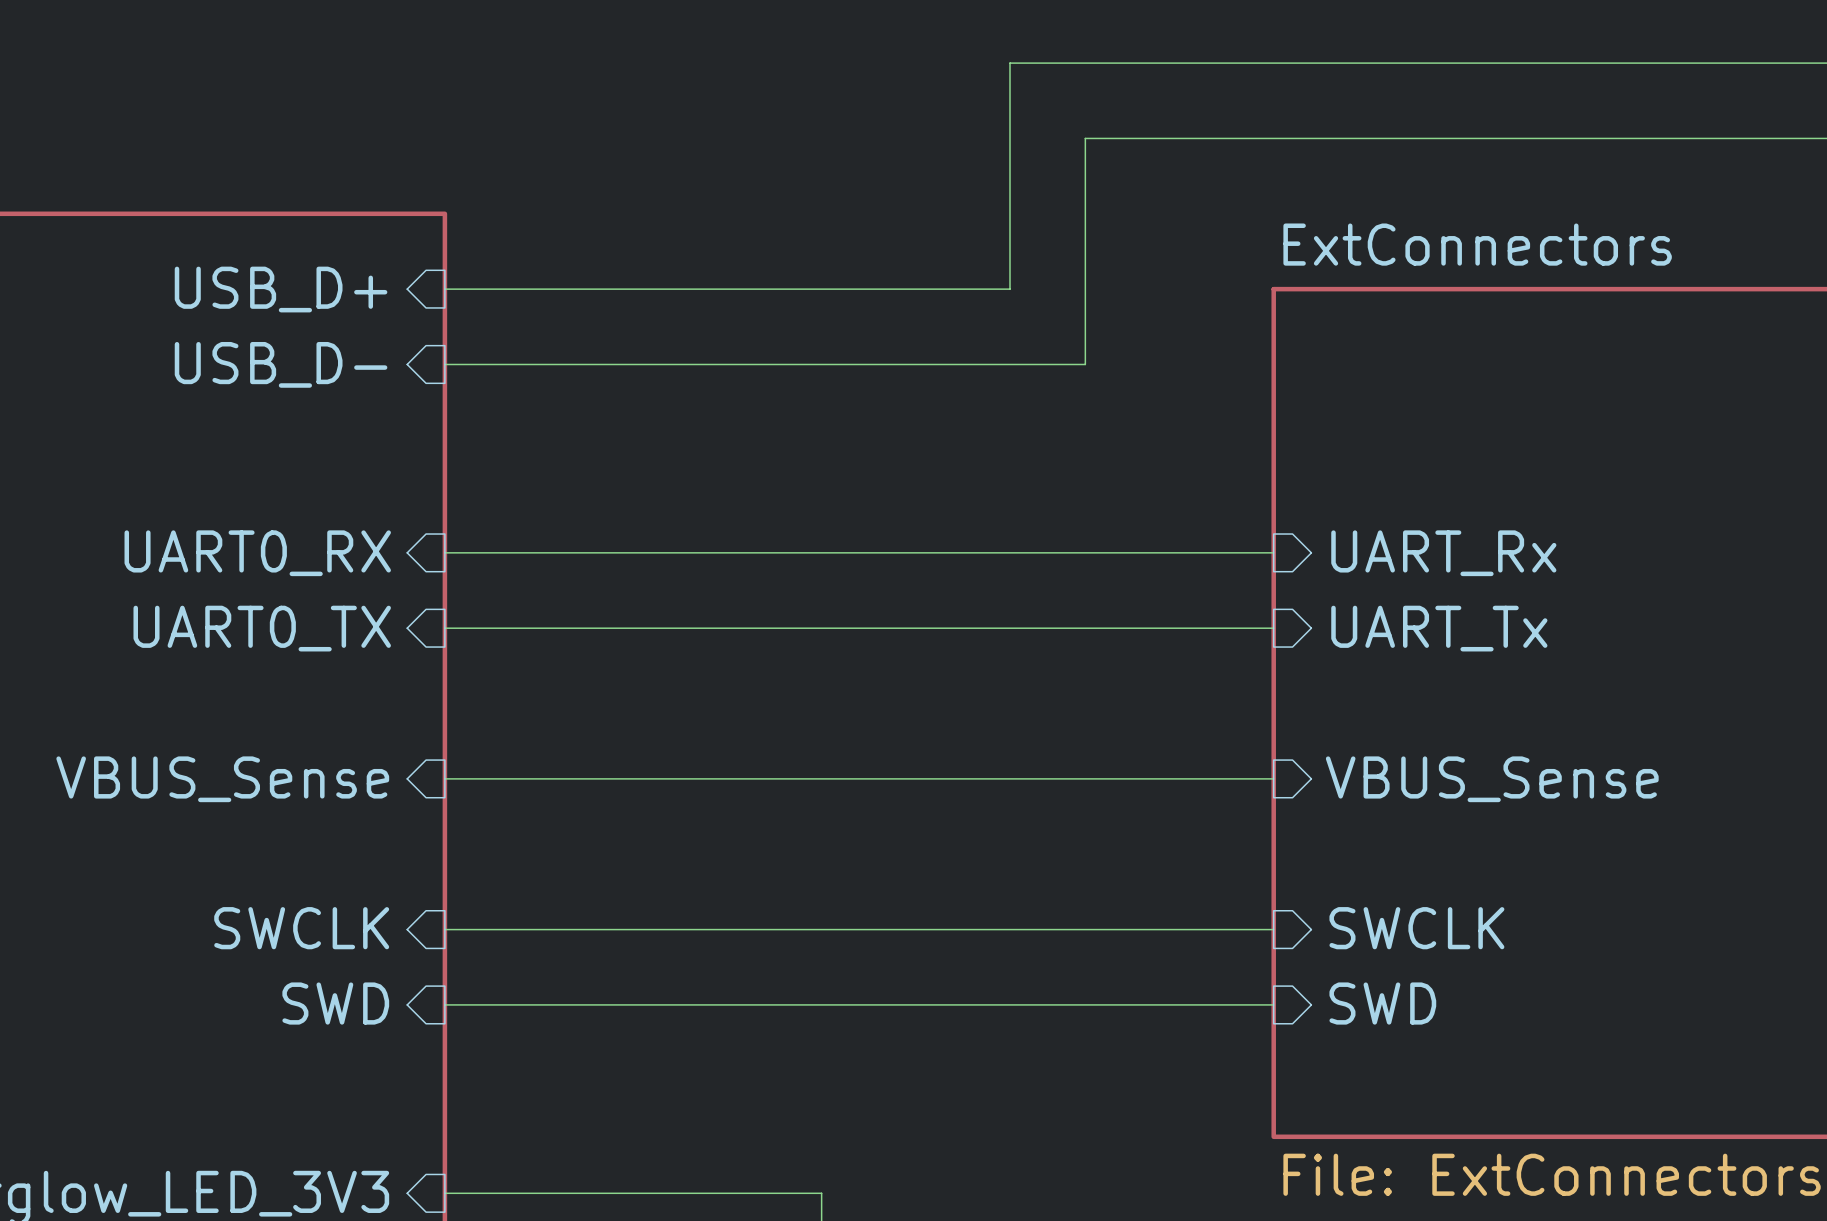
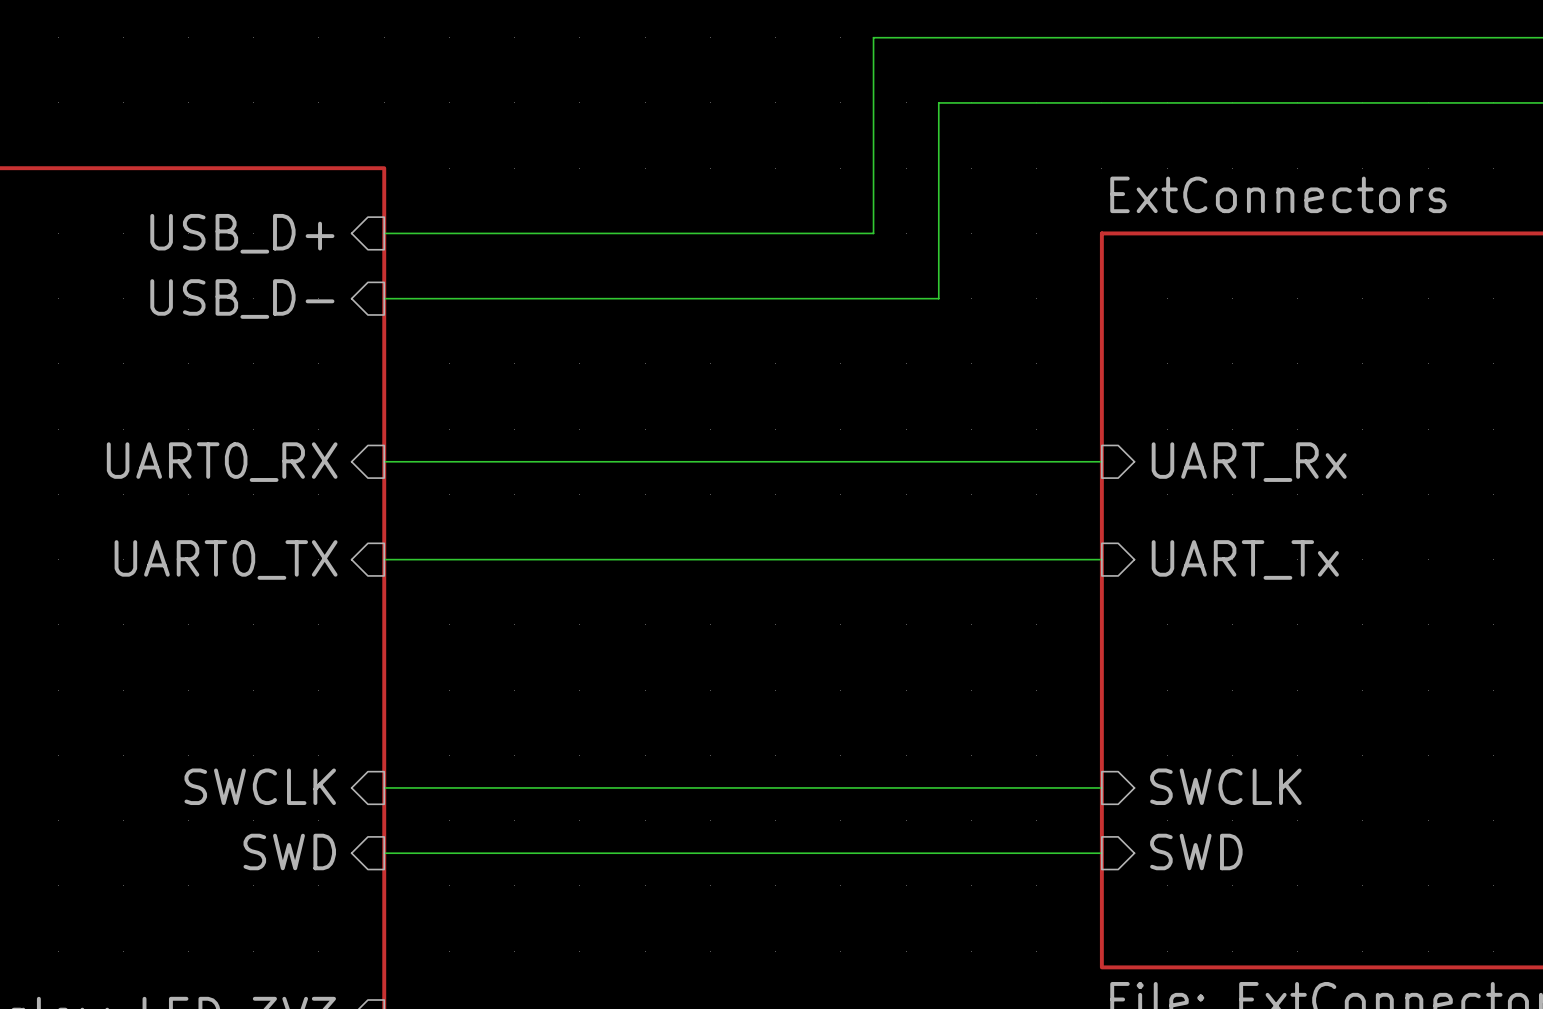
sheet pin position: UART0_TX (262, 628) -> UART0_TX (226, 559)
wire: (444, 628) (1273, 628) -> (384, 559) (1101, 559)
sheet pin position: UART_Tx (1439, 628) -> UART_Tx (1245, 559)
wire: (444, 778) (1273, 778) -> none
sheet pin: VBUS_Sense (222, 779) -> none
sheet pin: VBUS_Sense (1492, 779) -> none

